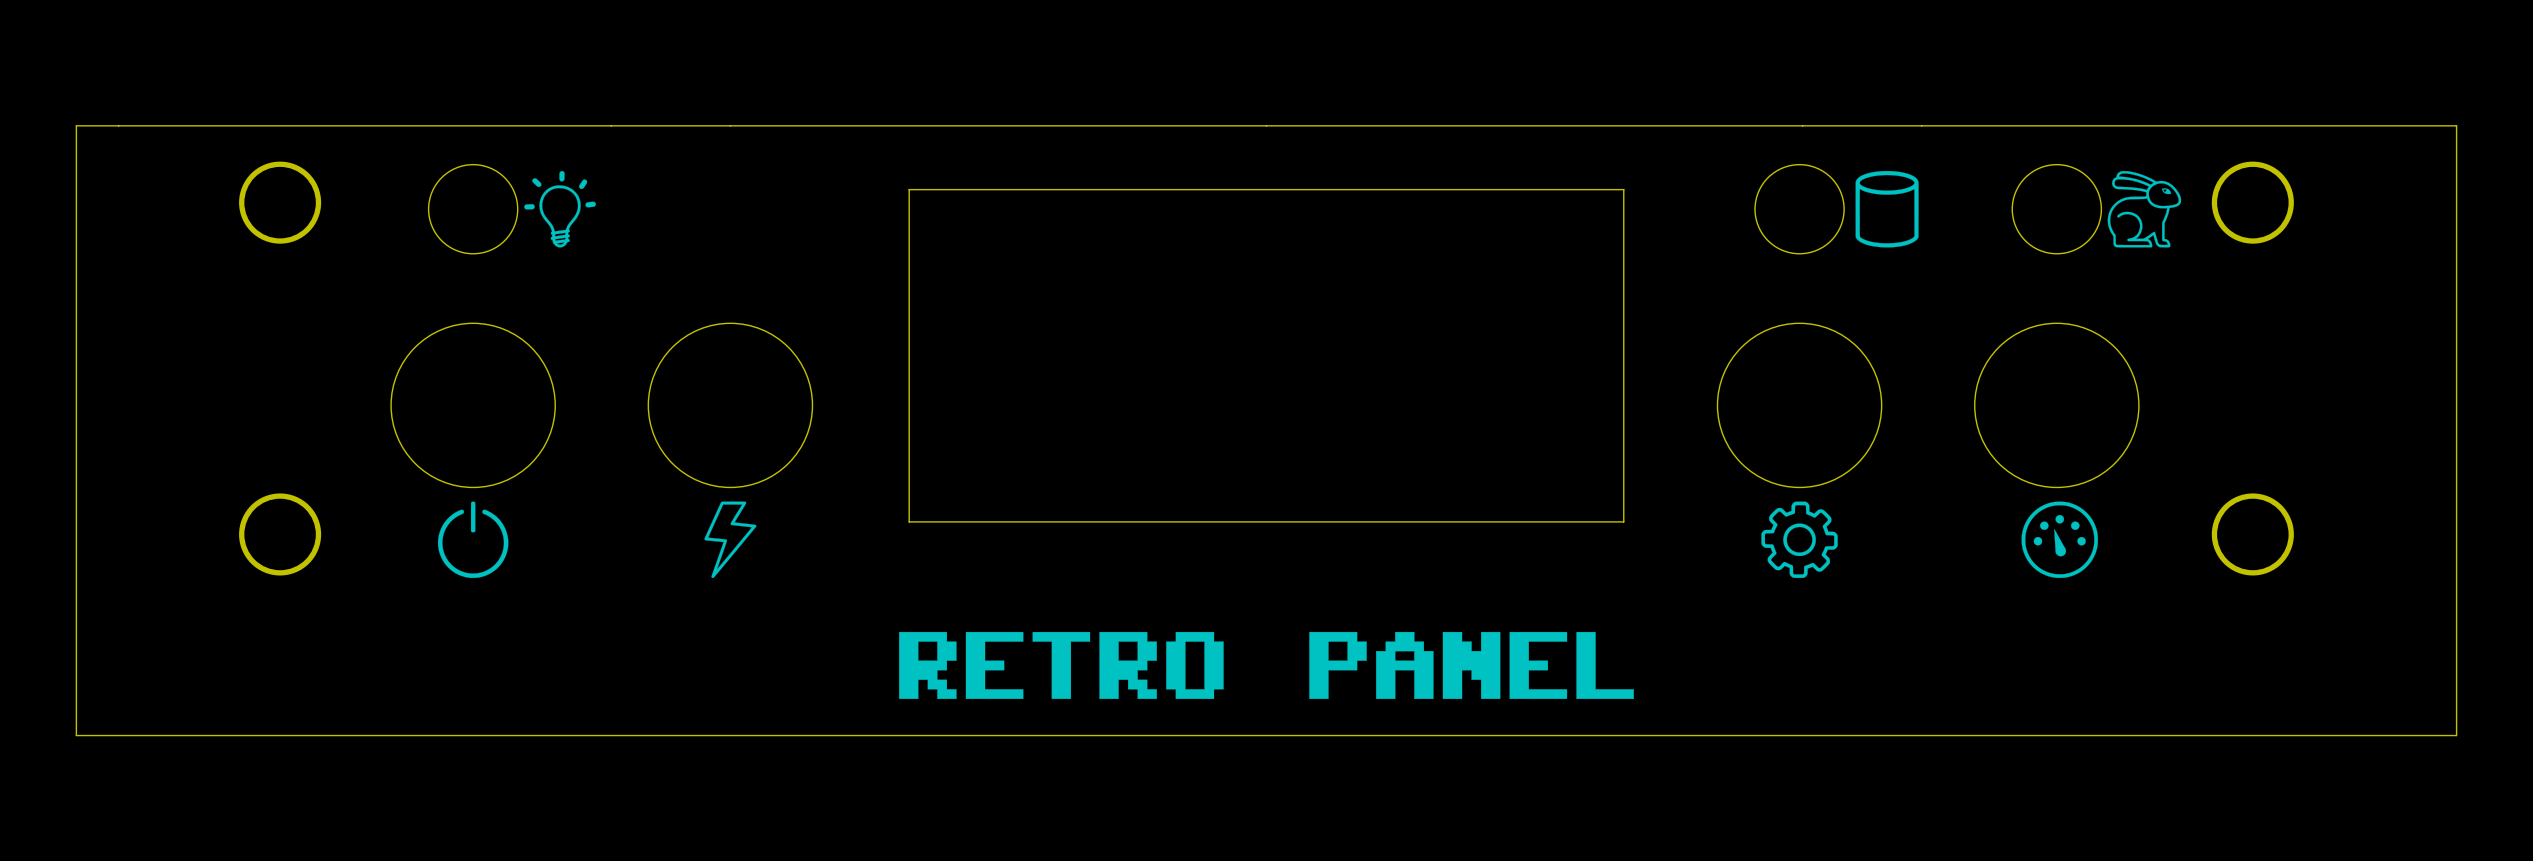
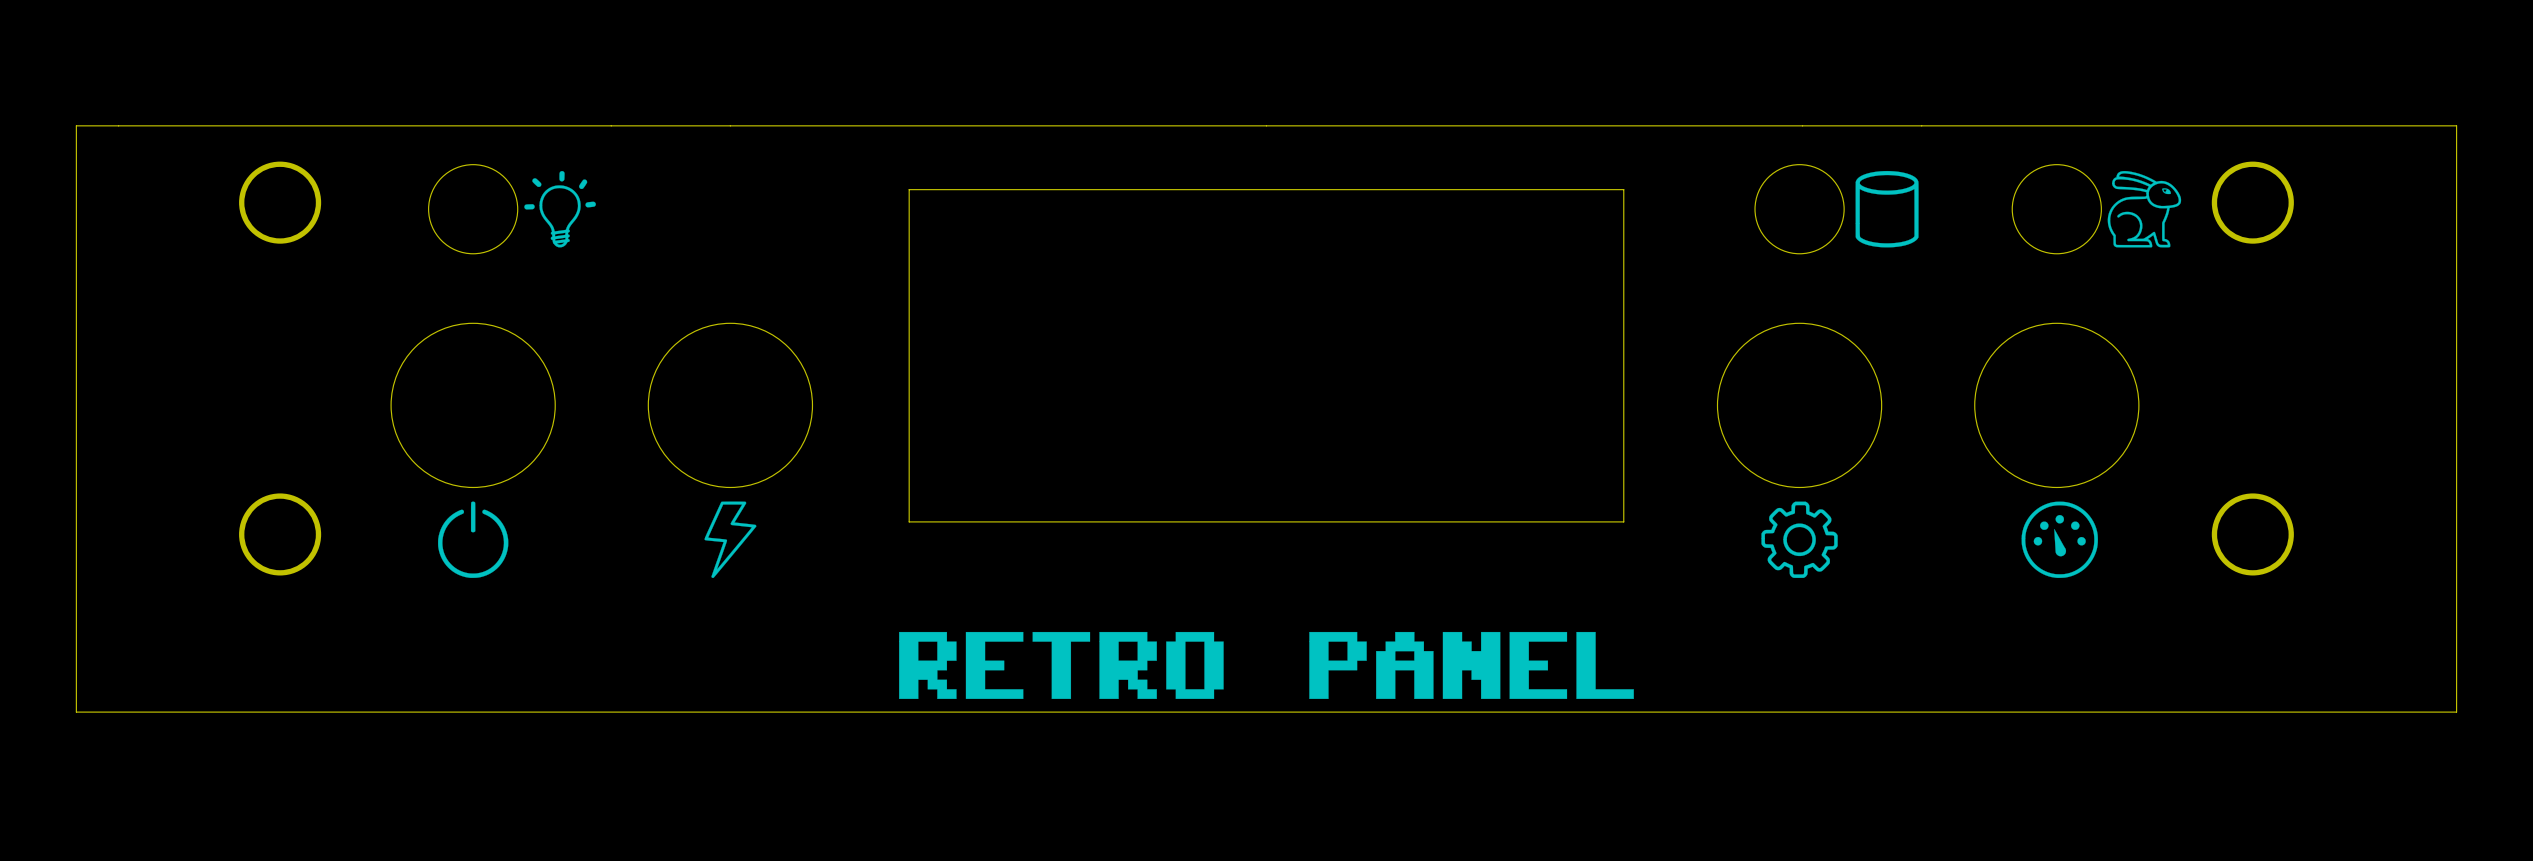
board edge: (76, 712) (76, 735) (2456, 735) (2456, 712) -> (76, 712) (2456, 712)

